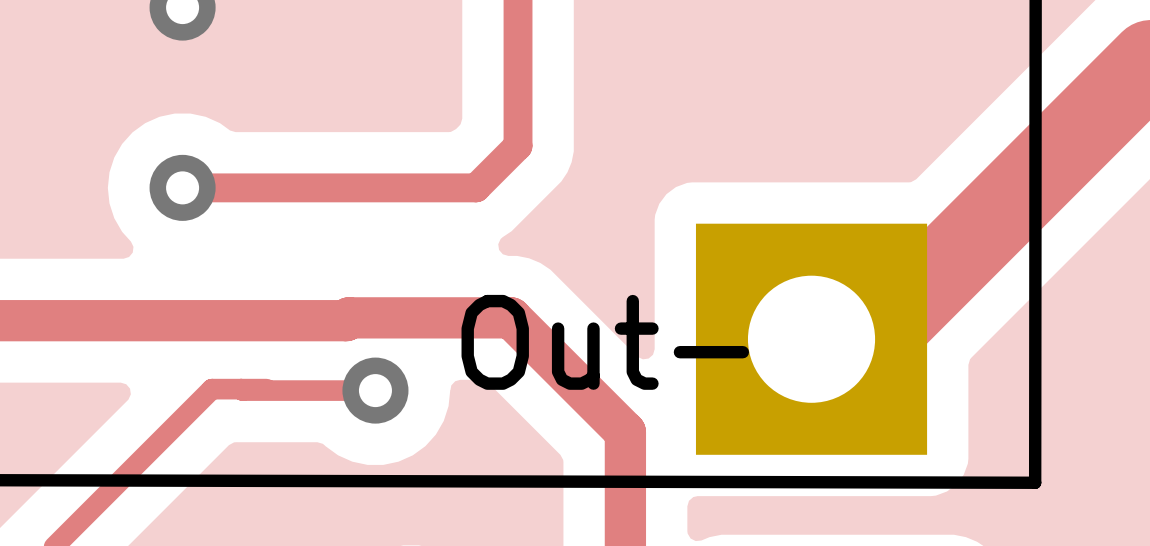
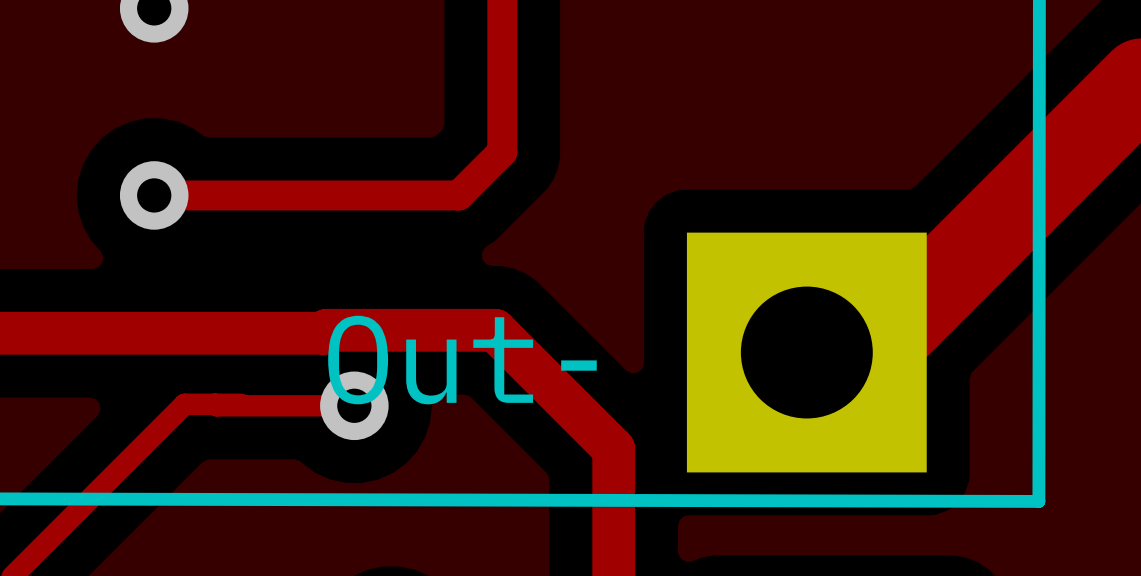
part text position: Out- (605, 342) -> Out- (462, 360)

